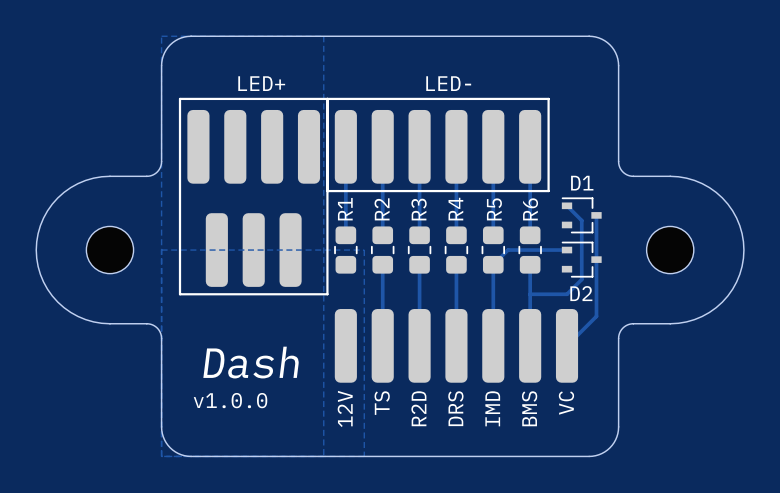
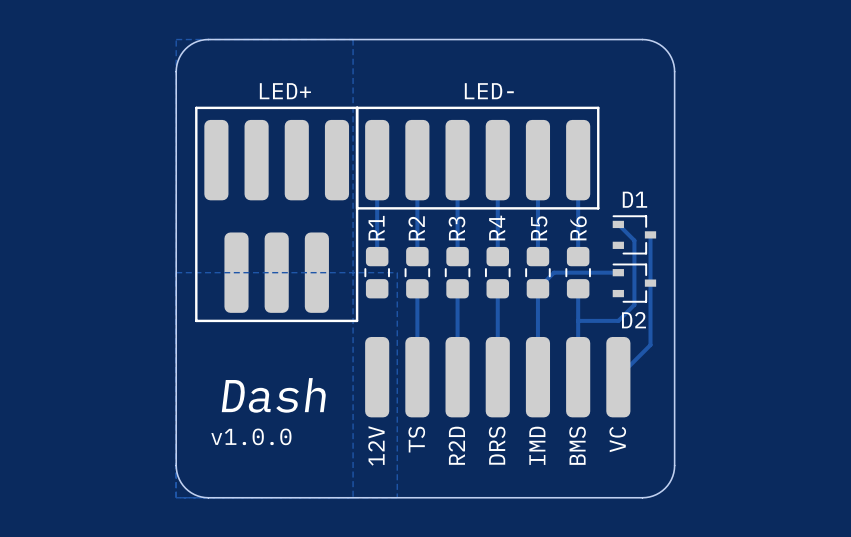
board edge: (161, 161) (158, 170) (150, 175) (101, 176) (85, 180) (70, 187) (57, 197) (43, 218) (38, 233) (36, 250) (38, 266) (43, 282) (57, 302) (70, 312) (85, 319) (101, 323) (150, 324) (158, 329) (161, 338) -> (176, 176) (176, 369)
board edge: (618, 161) (621, 170) (630, 175) (678, 176) (694, 180) (709, 187) (722, 197) (736, 218) (742, 233) (743, 250) (742, 266) (736, 282) (722, 302) (709, 312) (694, 319) (678, 323) (630, 324) (621, 329) (618, 338) -> (674, 176) (674, 369)
part: (109, 250) -> none
part: (670, 250) -> none

